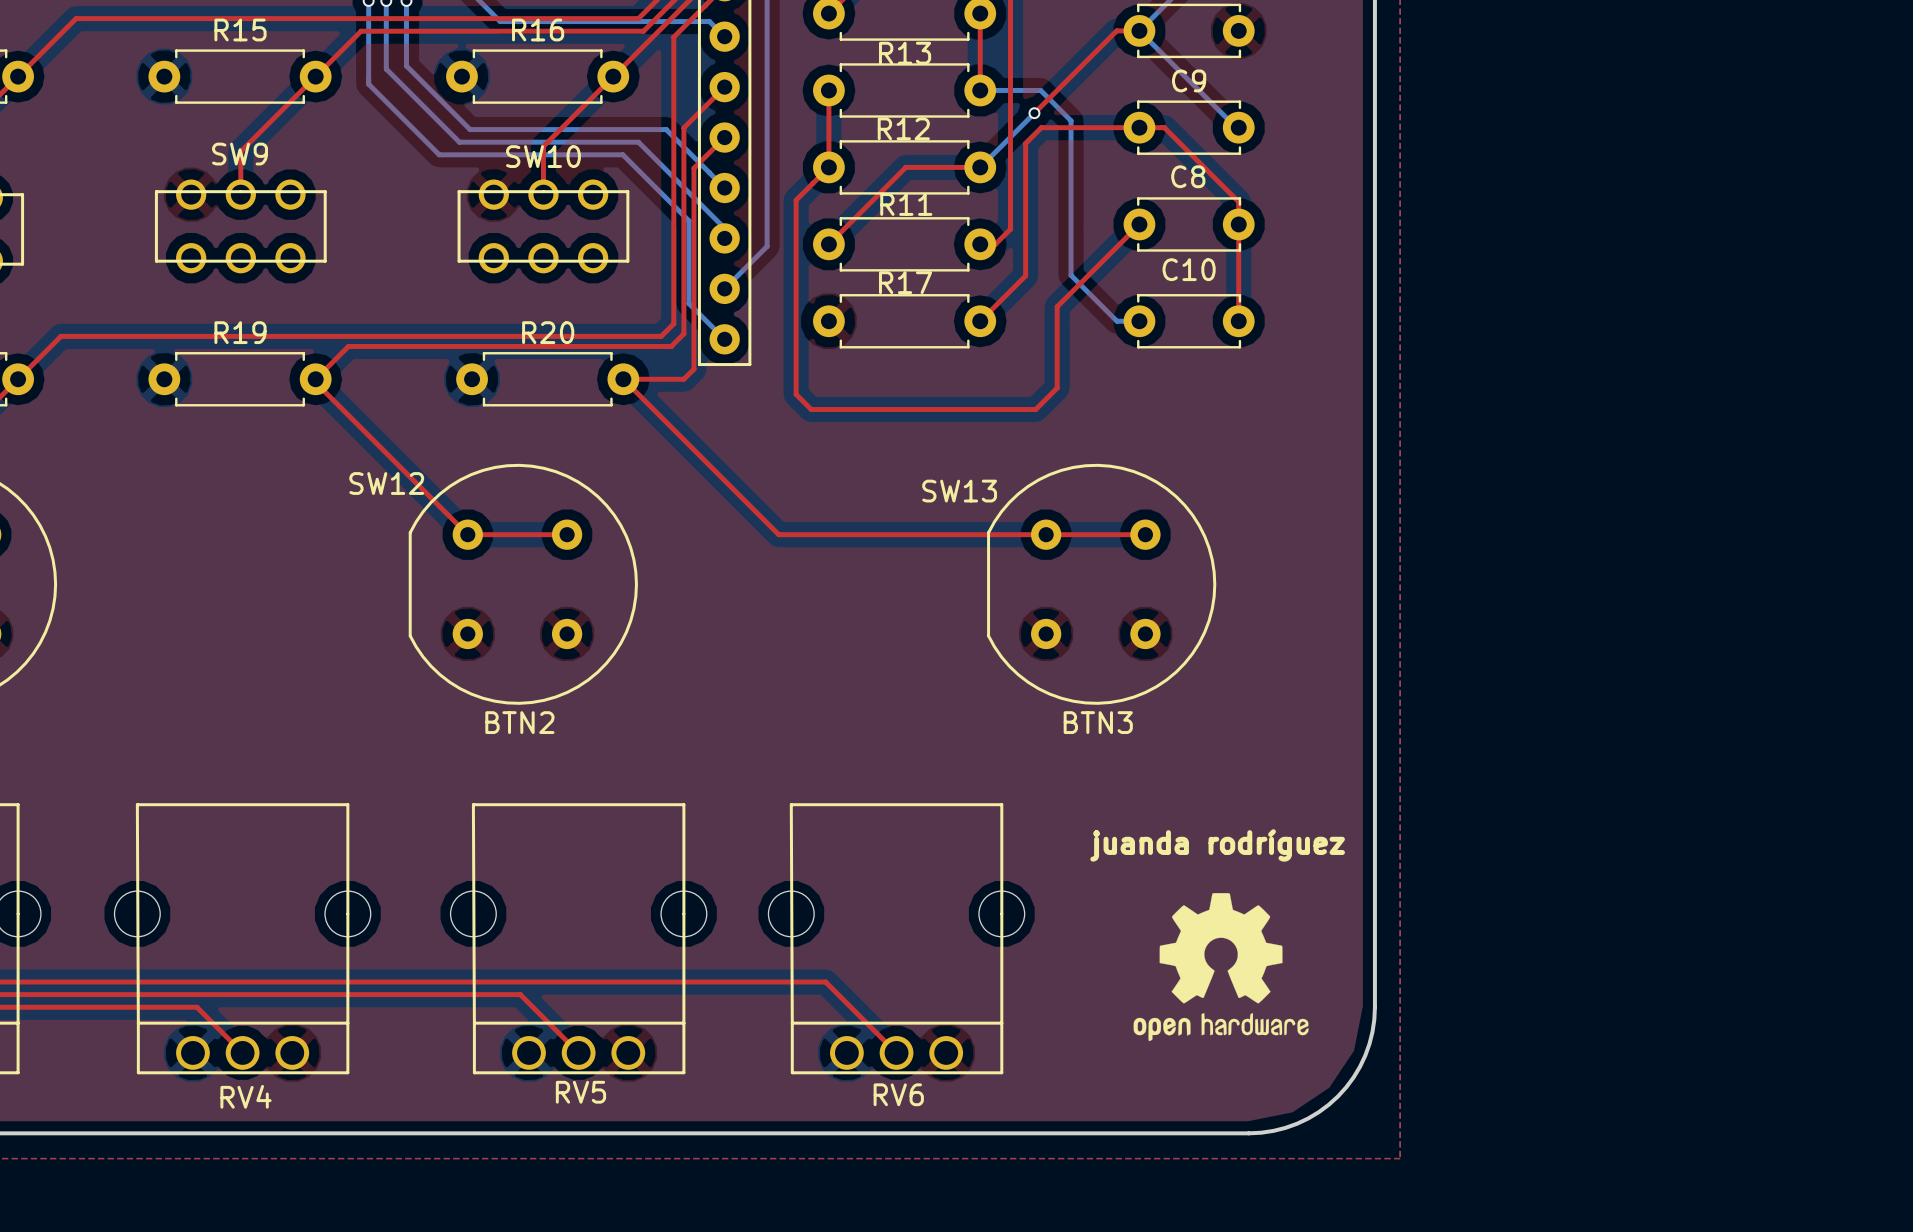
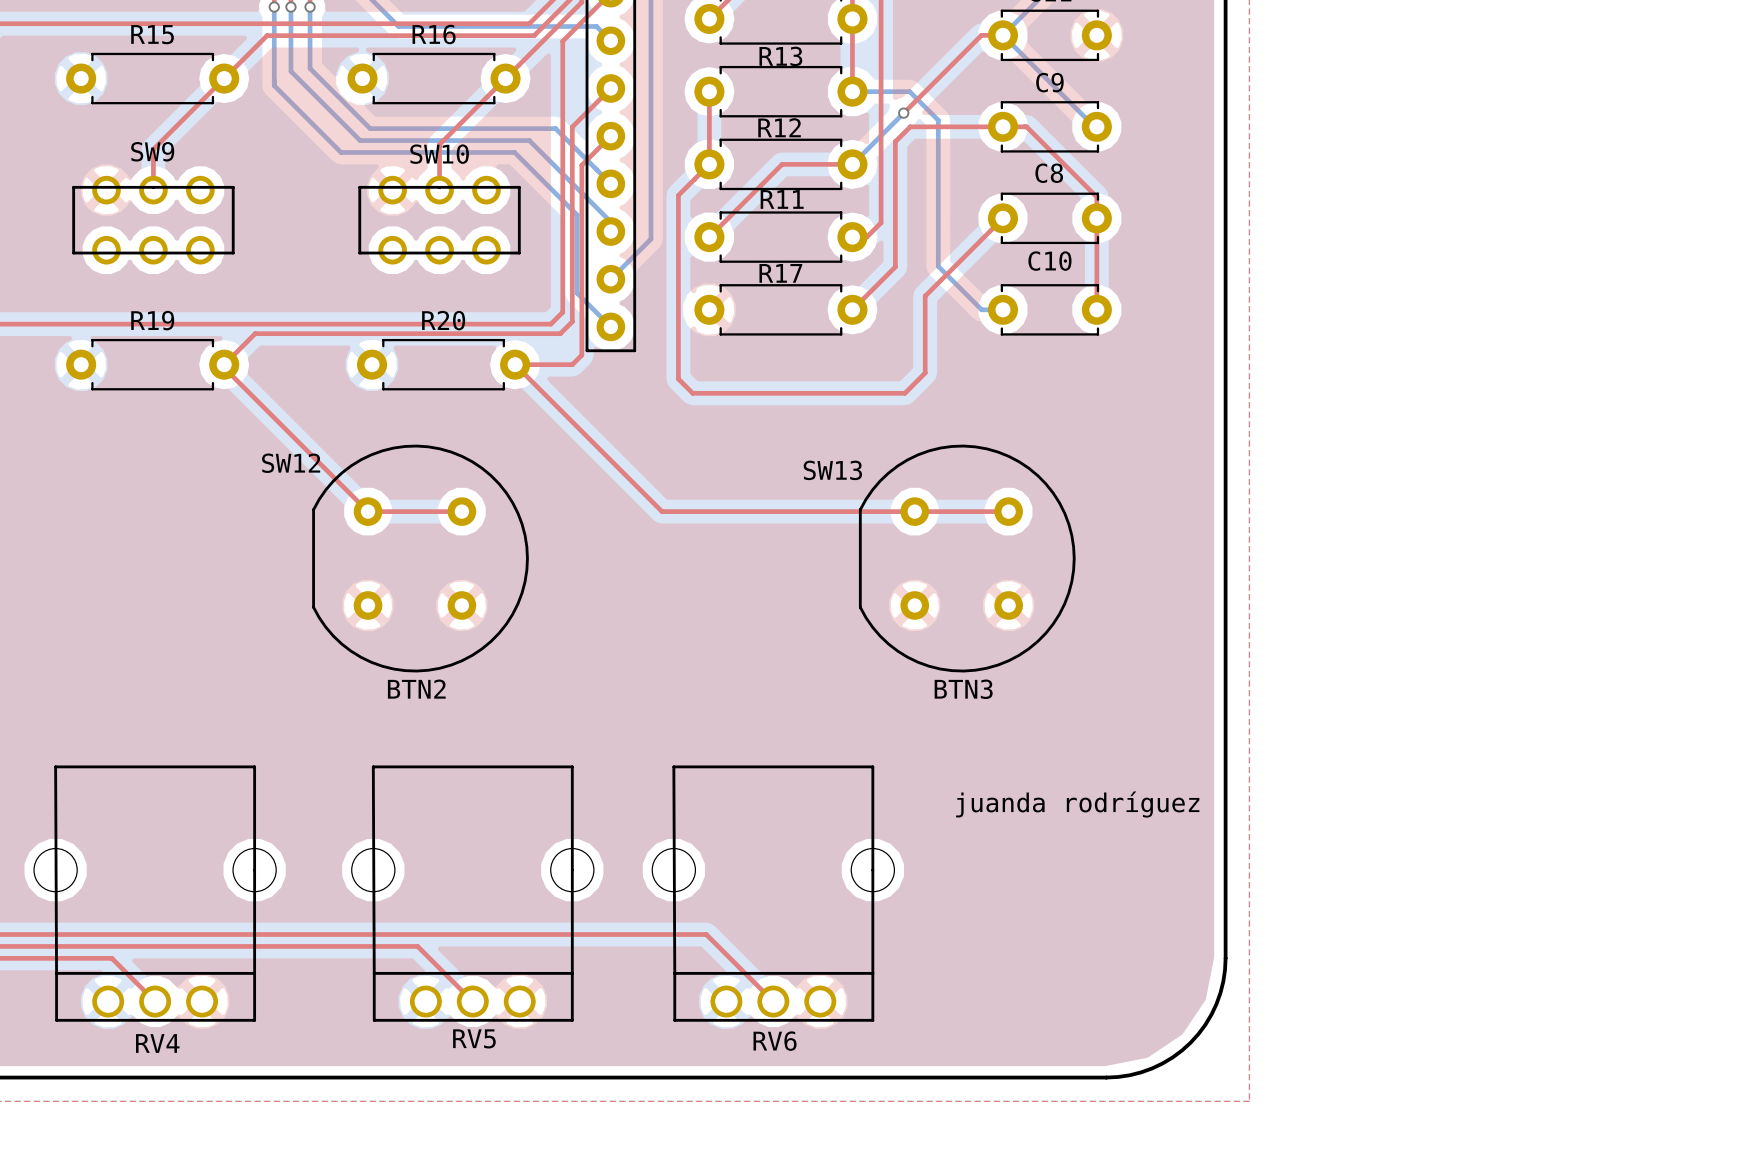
drawing: [1133, 893, 1309, 1042] -> none

